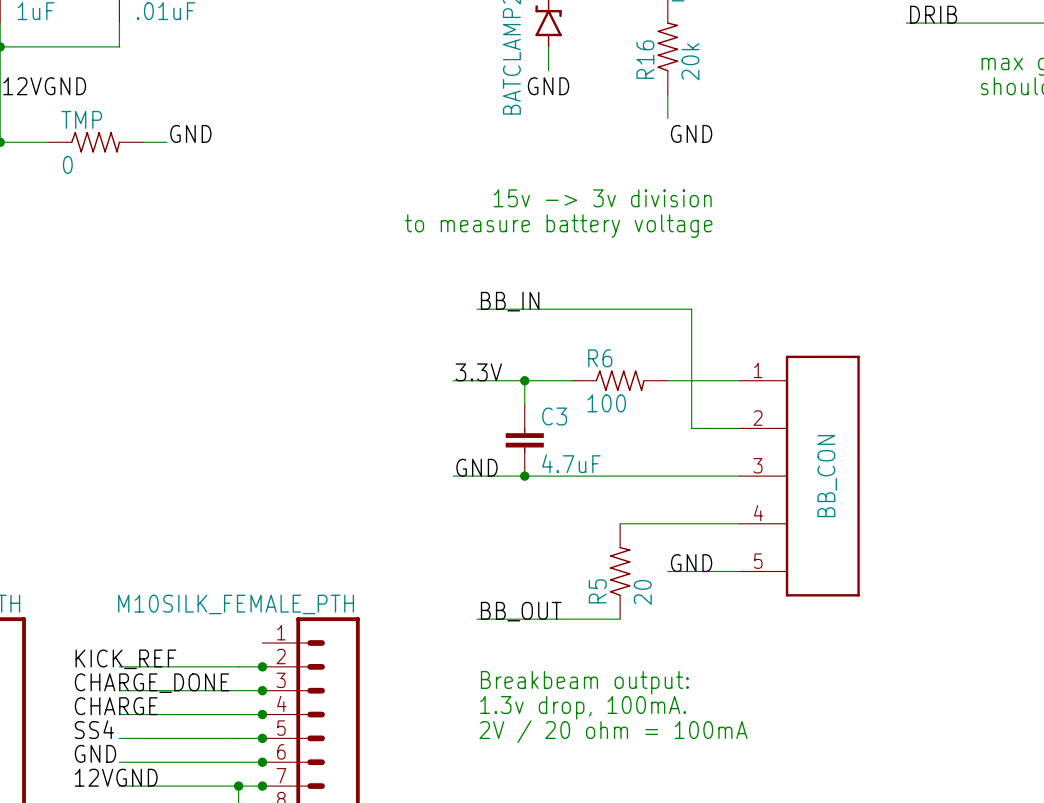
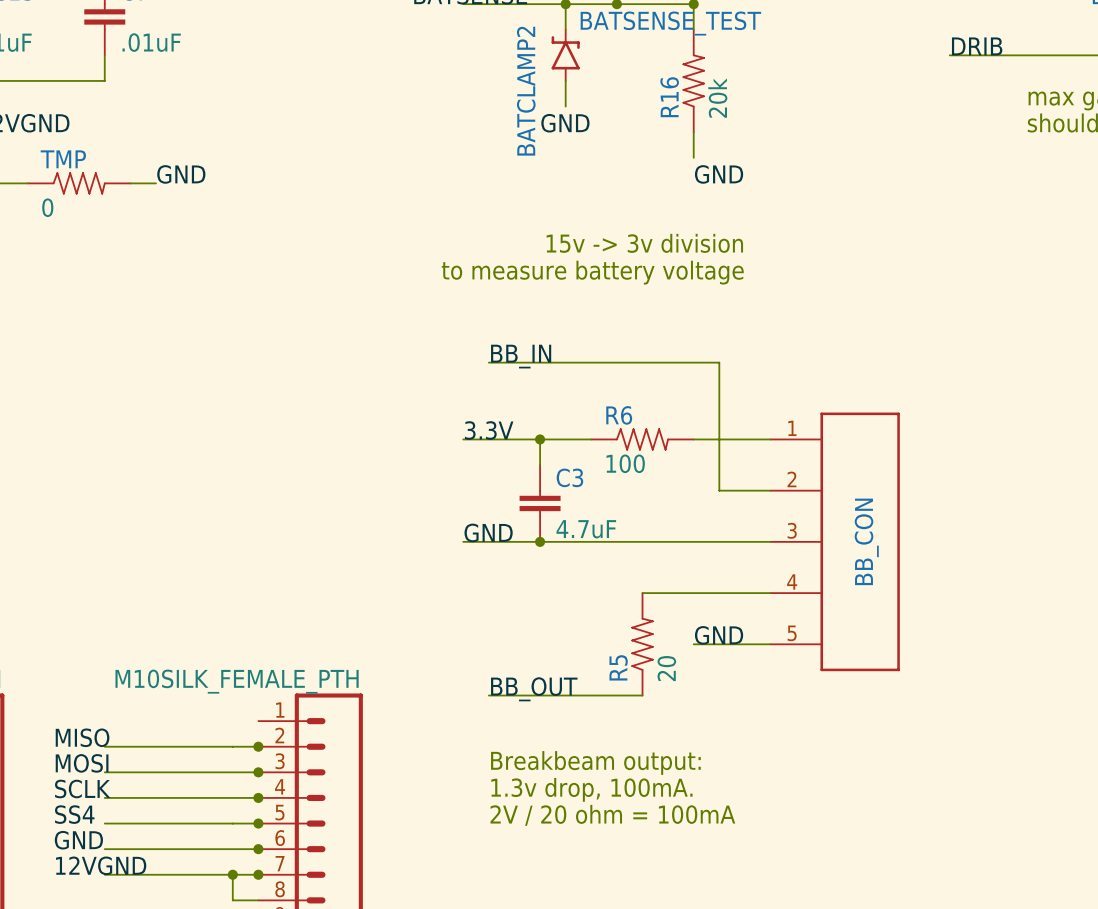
label: KICK_REF (125, 659) -> MISO (82, 737)
label: CHARGE_DONE (151, 683) -> MOSI (82, 763)
label: CHARGE (116, 706) -> SCLK (82, 788)

